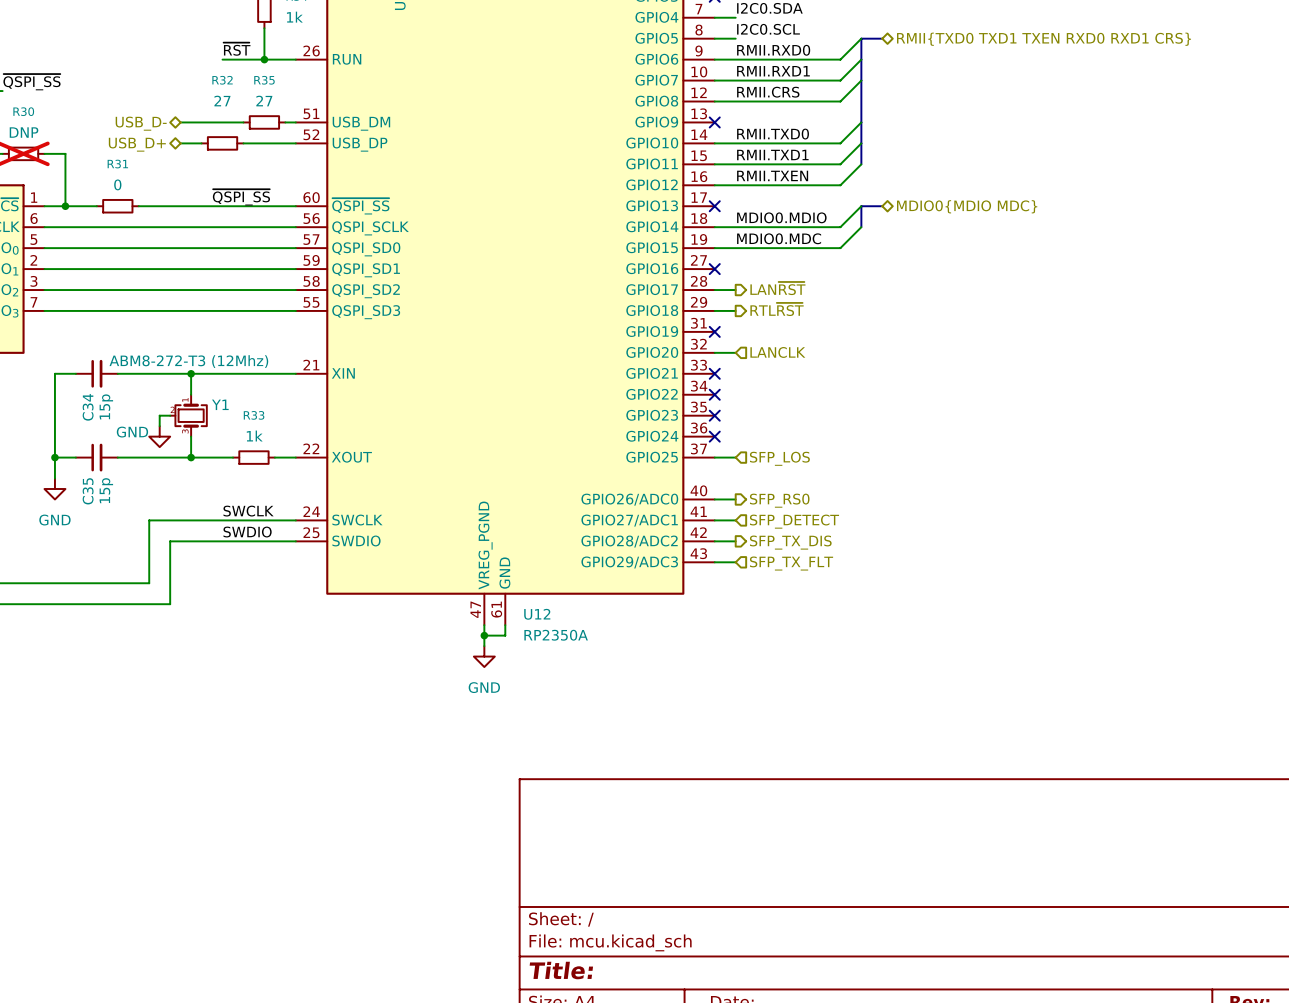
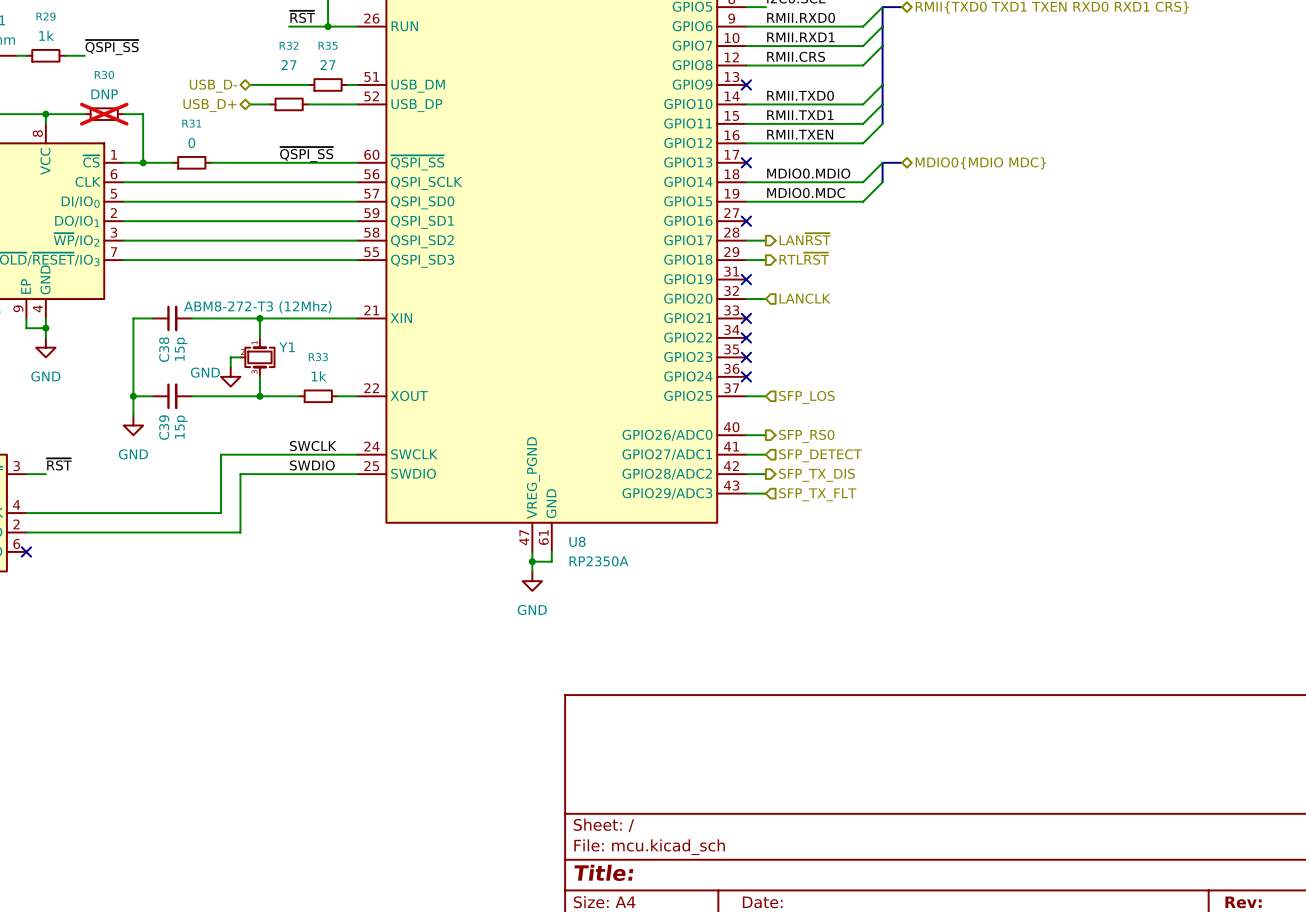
C34 name: C34 (88, 407) -> C38 (164, 349)
C35 name: C35 (88, 491) -> C39 (164, 427)
U12 name: U12 (537, 614) -> U8 (577, 541)

